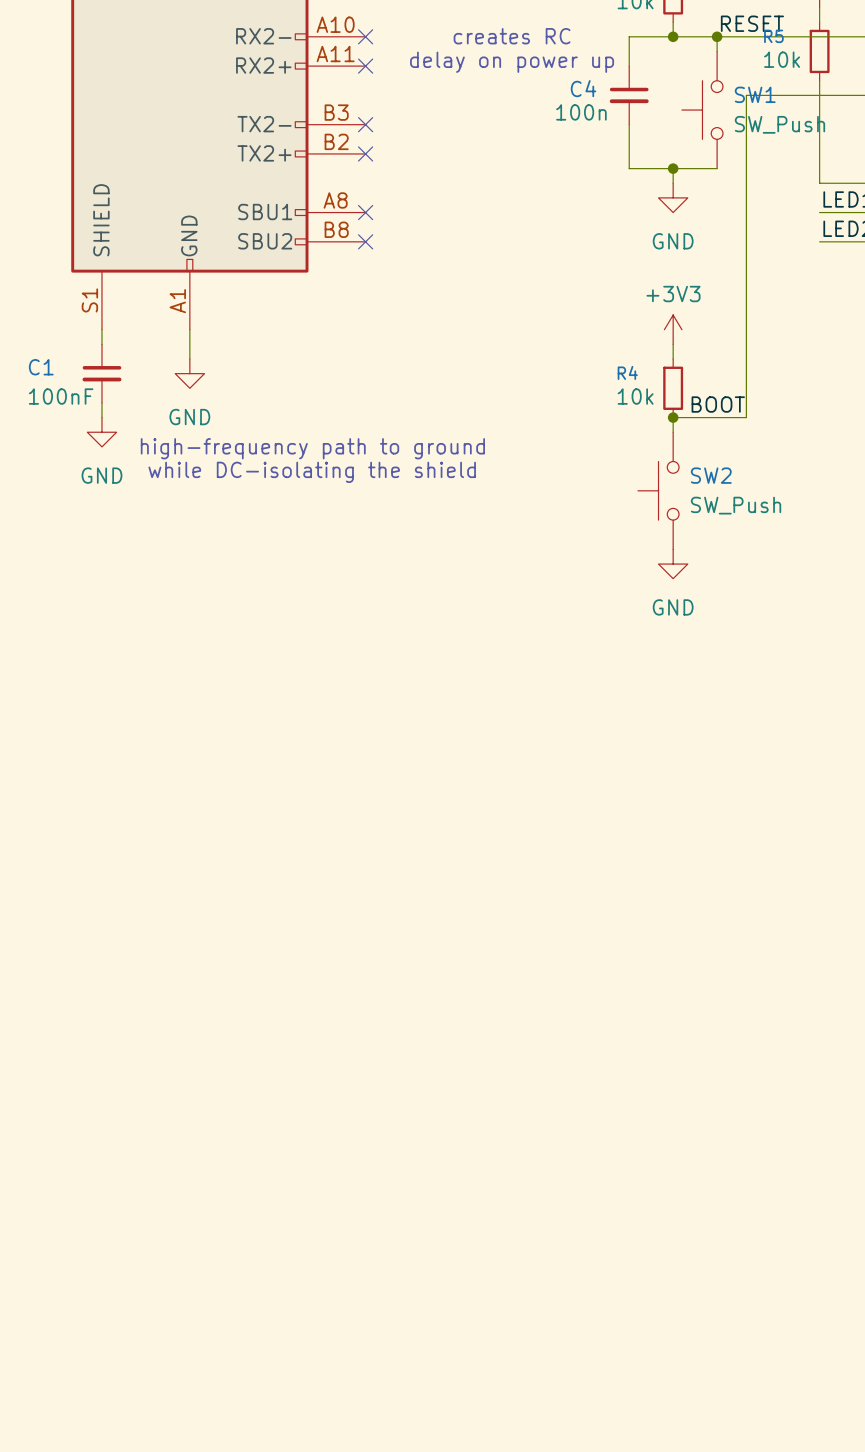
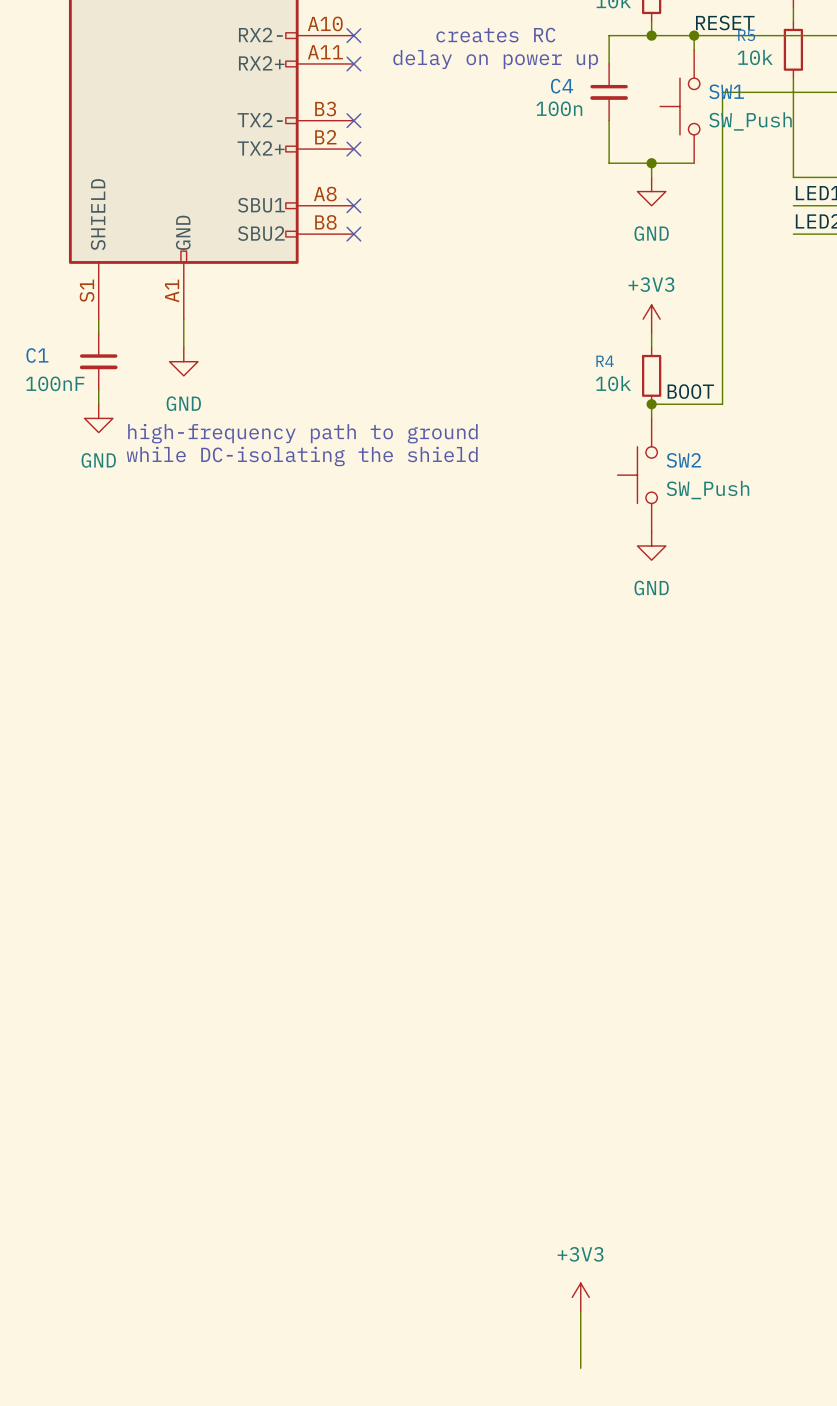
power symbol: none -> +3V3 (580, 1297)
wire: none -> (580, 1311) (580, 1368)

